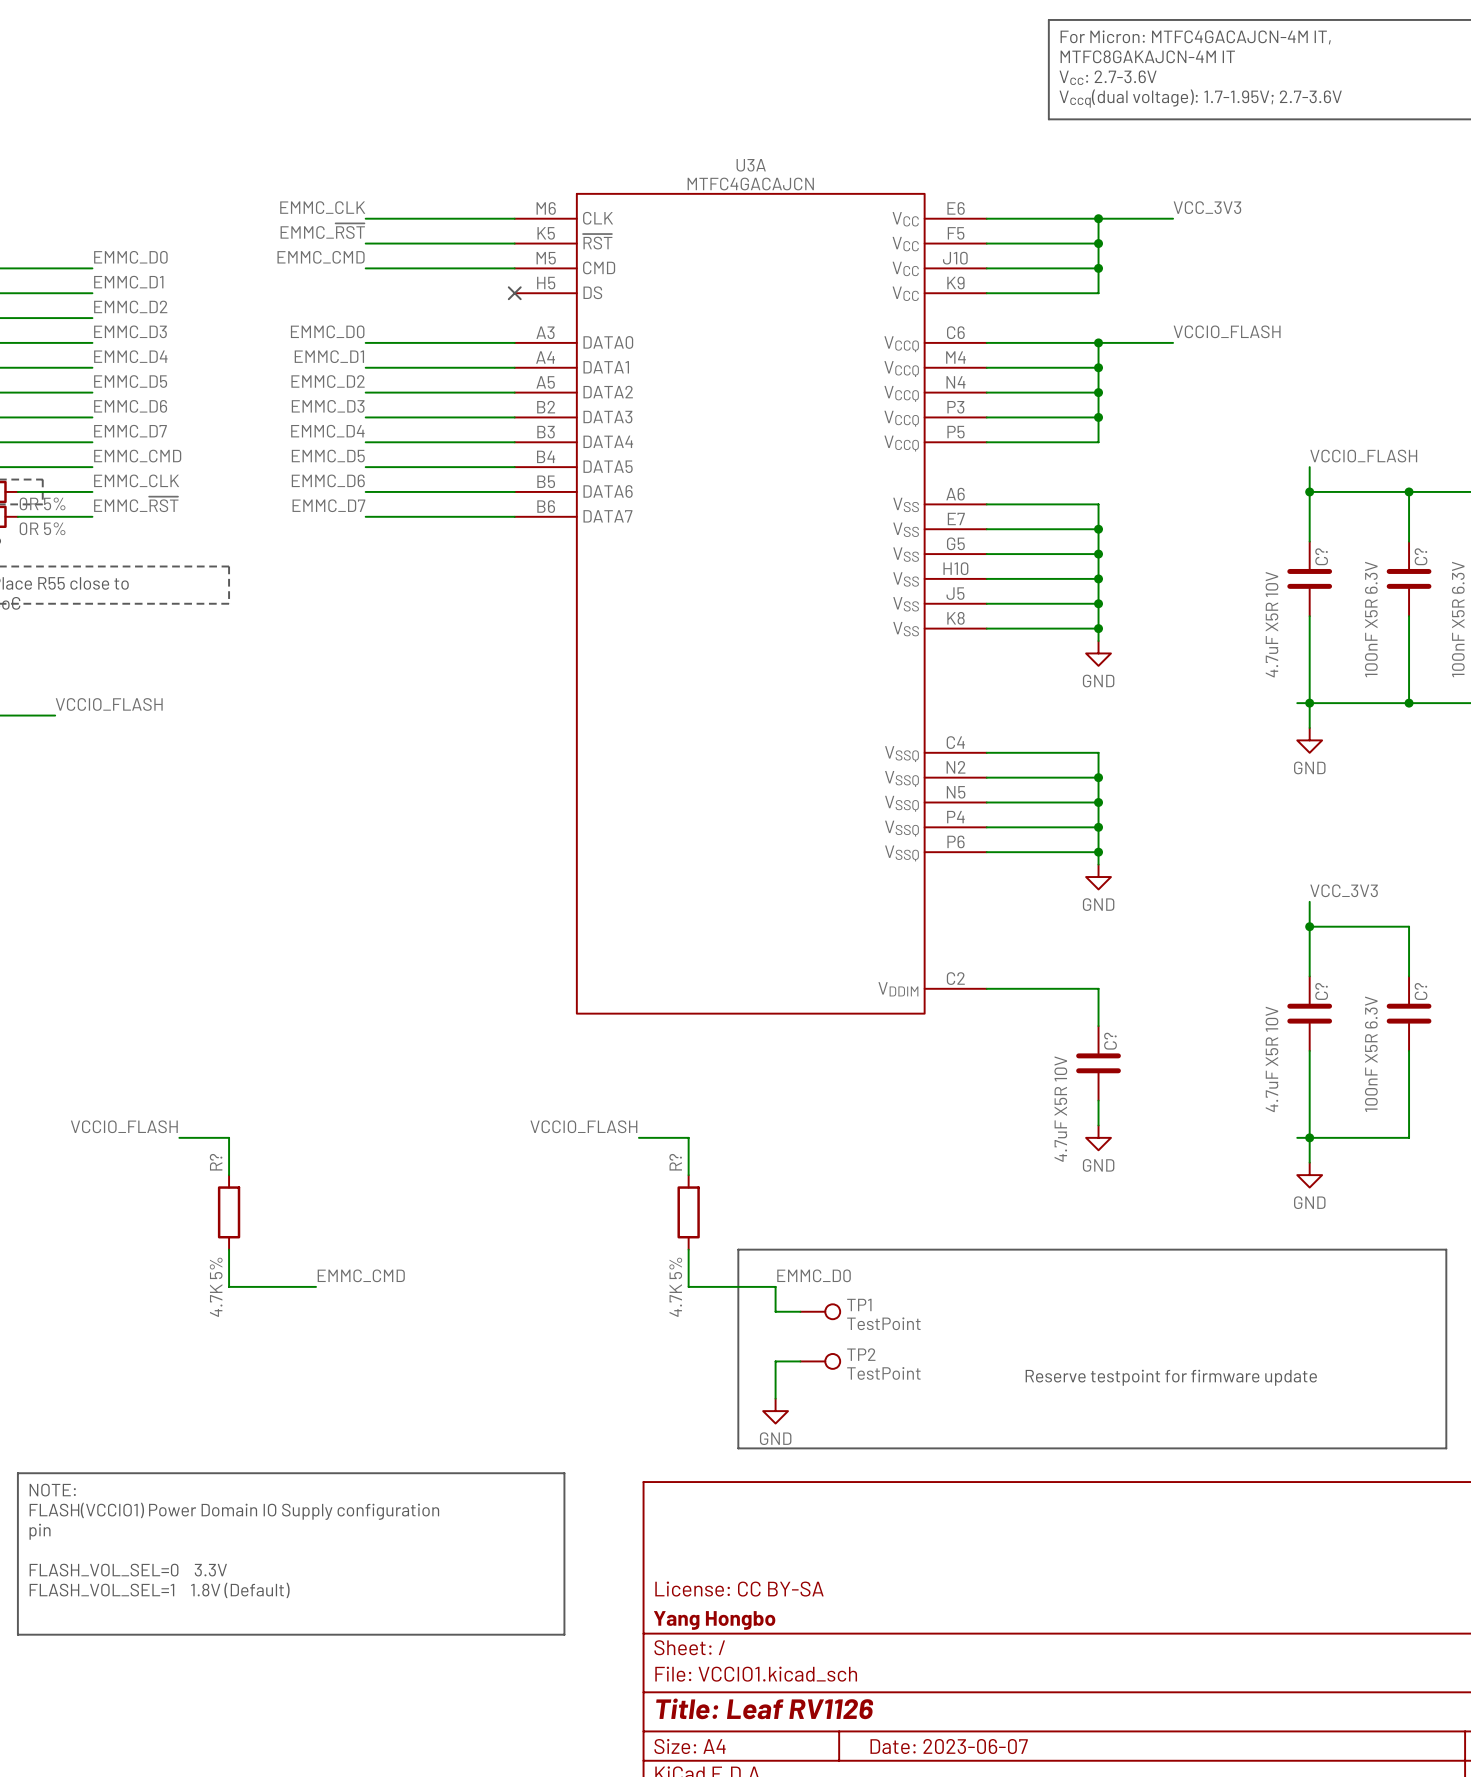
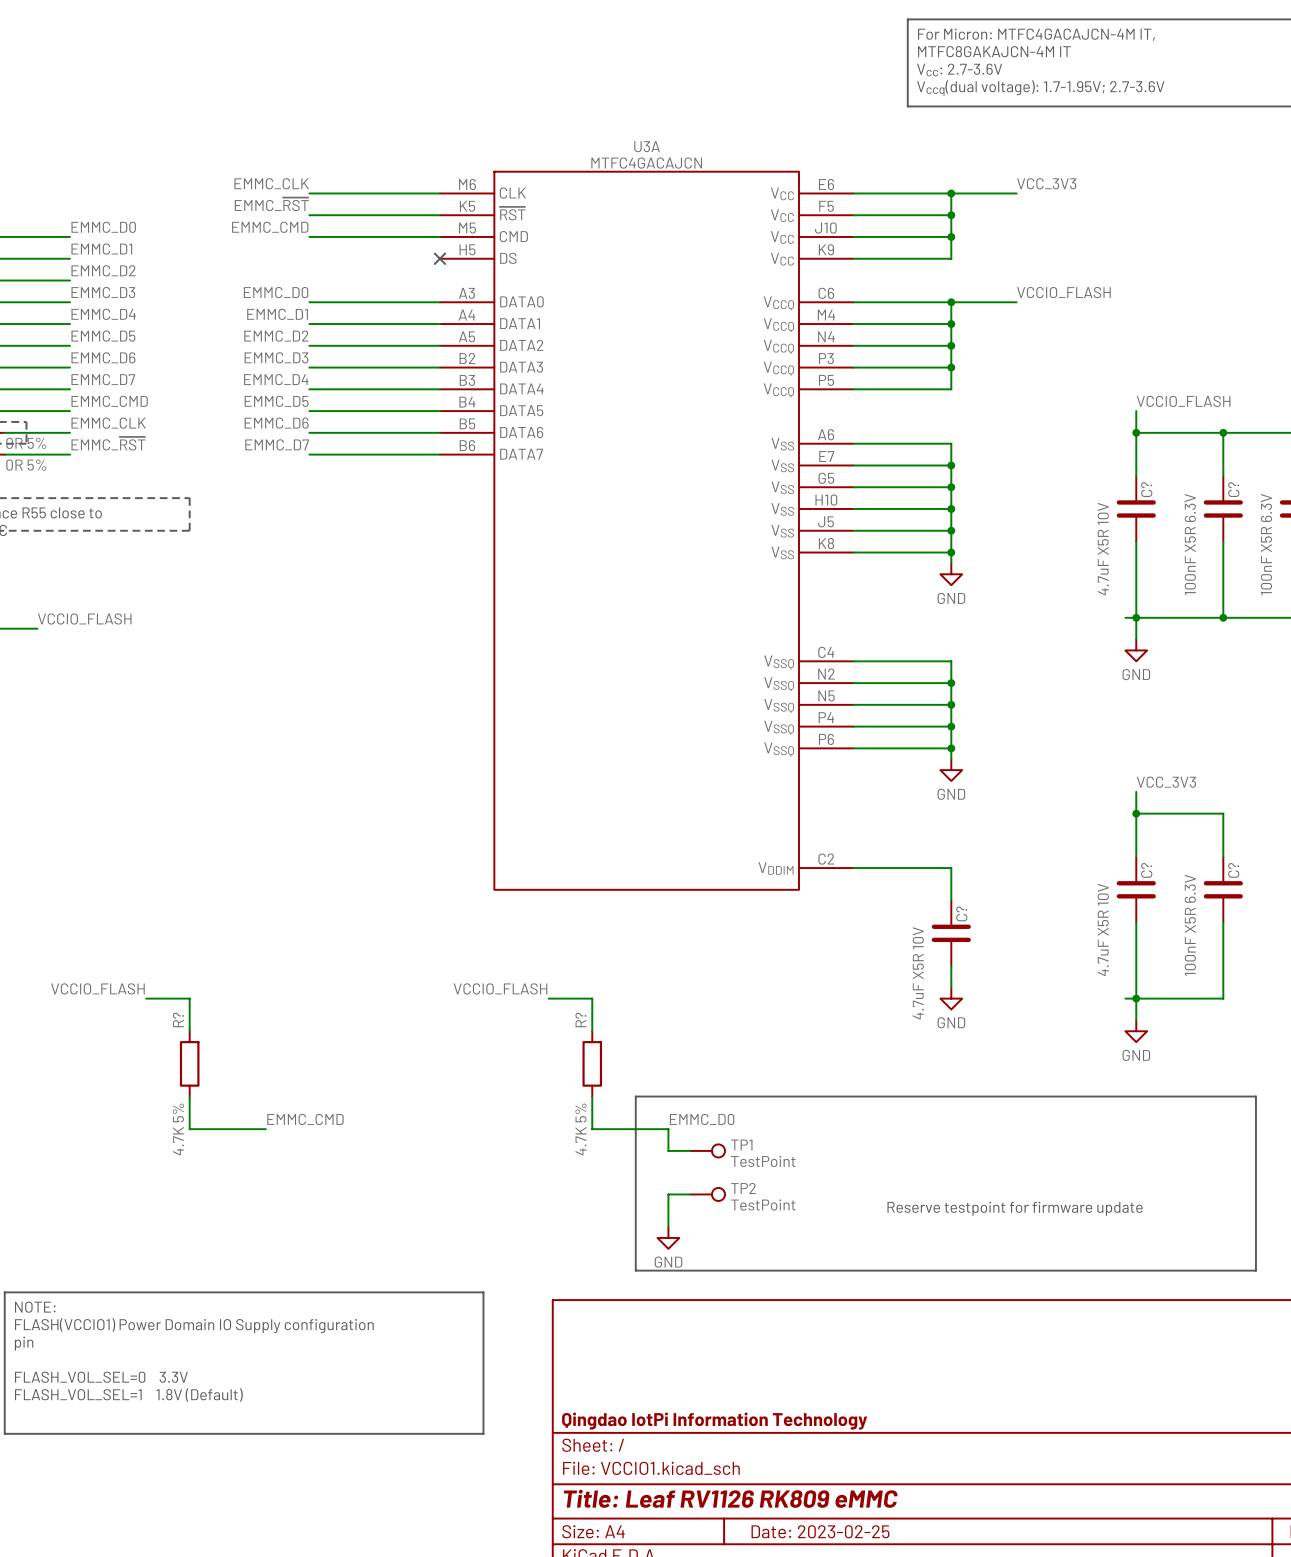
title block: License: CC BY-SA (739, 1589) -> none
title block: Yang Hongbo (714, 1620) -> Qingdao IotPi Information Technology (714, 1421)
title block: Title: Leaf RV1126 (764, 1708) -> Title: Leaf RV1126 RK809 eMMC (730, 1498)
title block: Date: 2023-06-07 (949, 1746) -> Date: 2023-02-25 (820, 1531)

